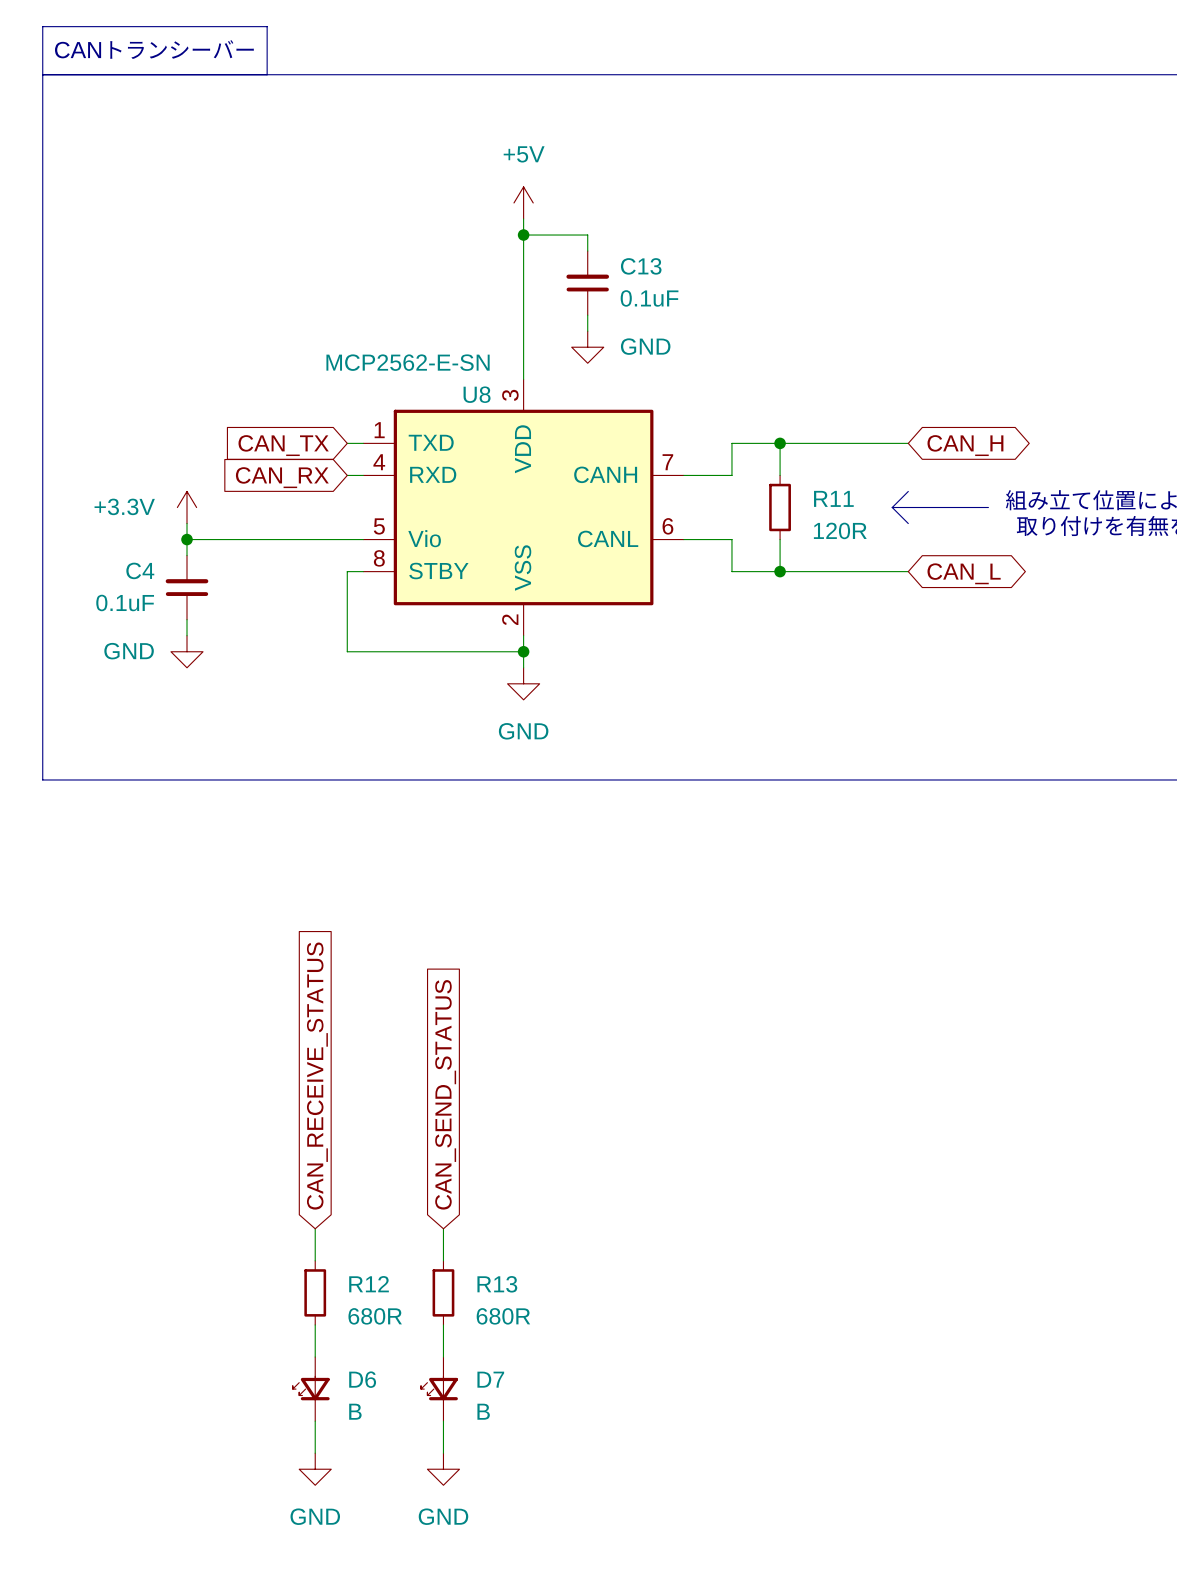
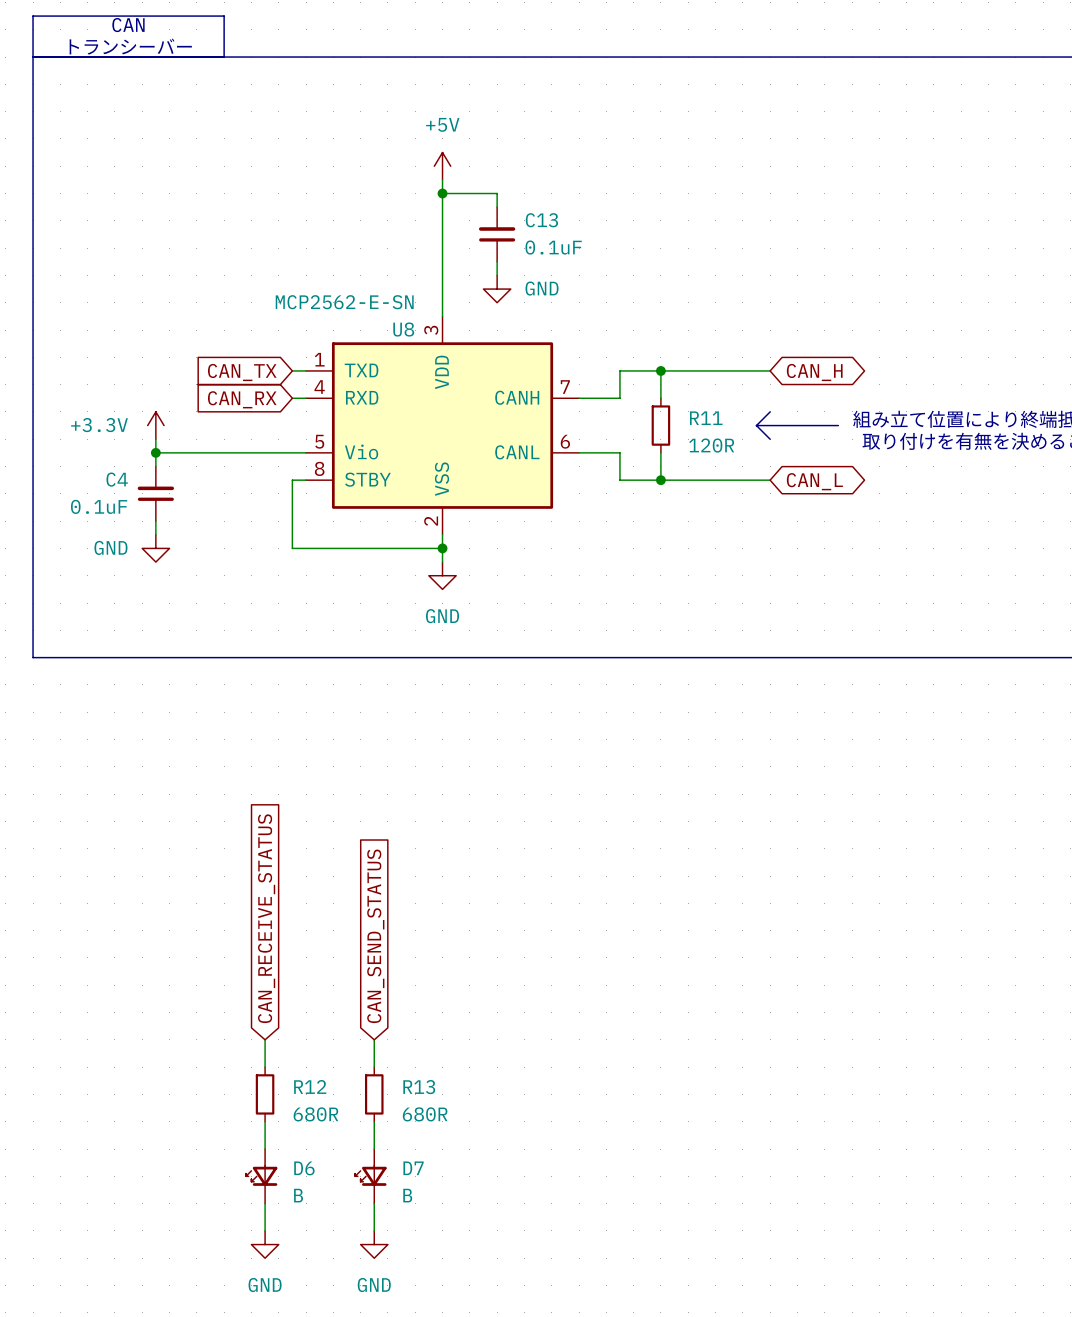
text: none -> CAN (128, 25)
text: CANトランシーバー (154, 49) -> トランシーバー (130, 46)

